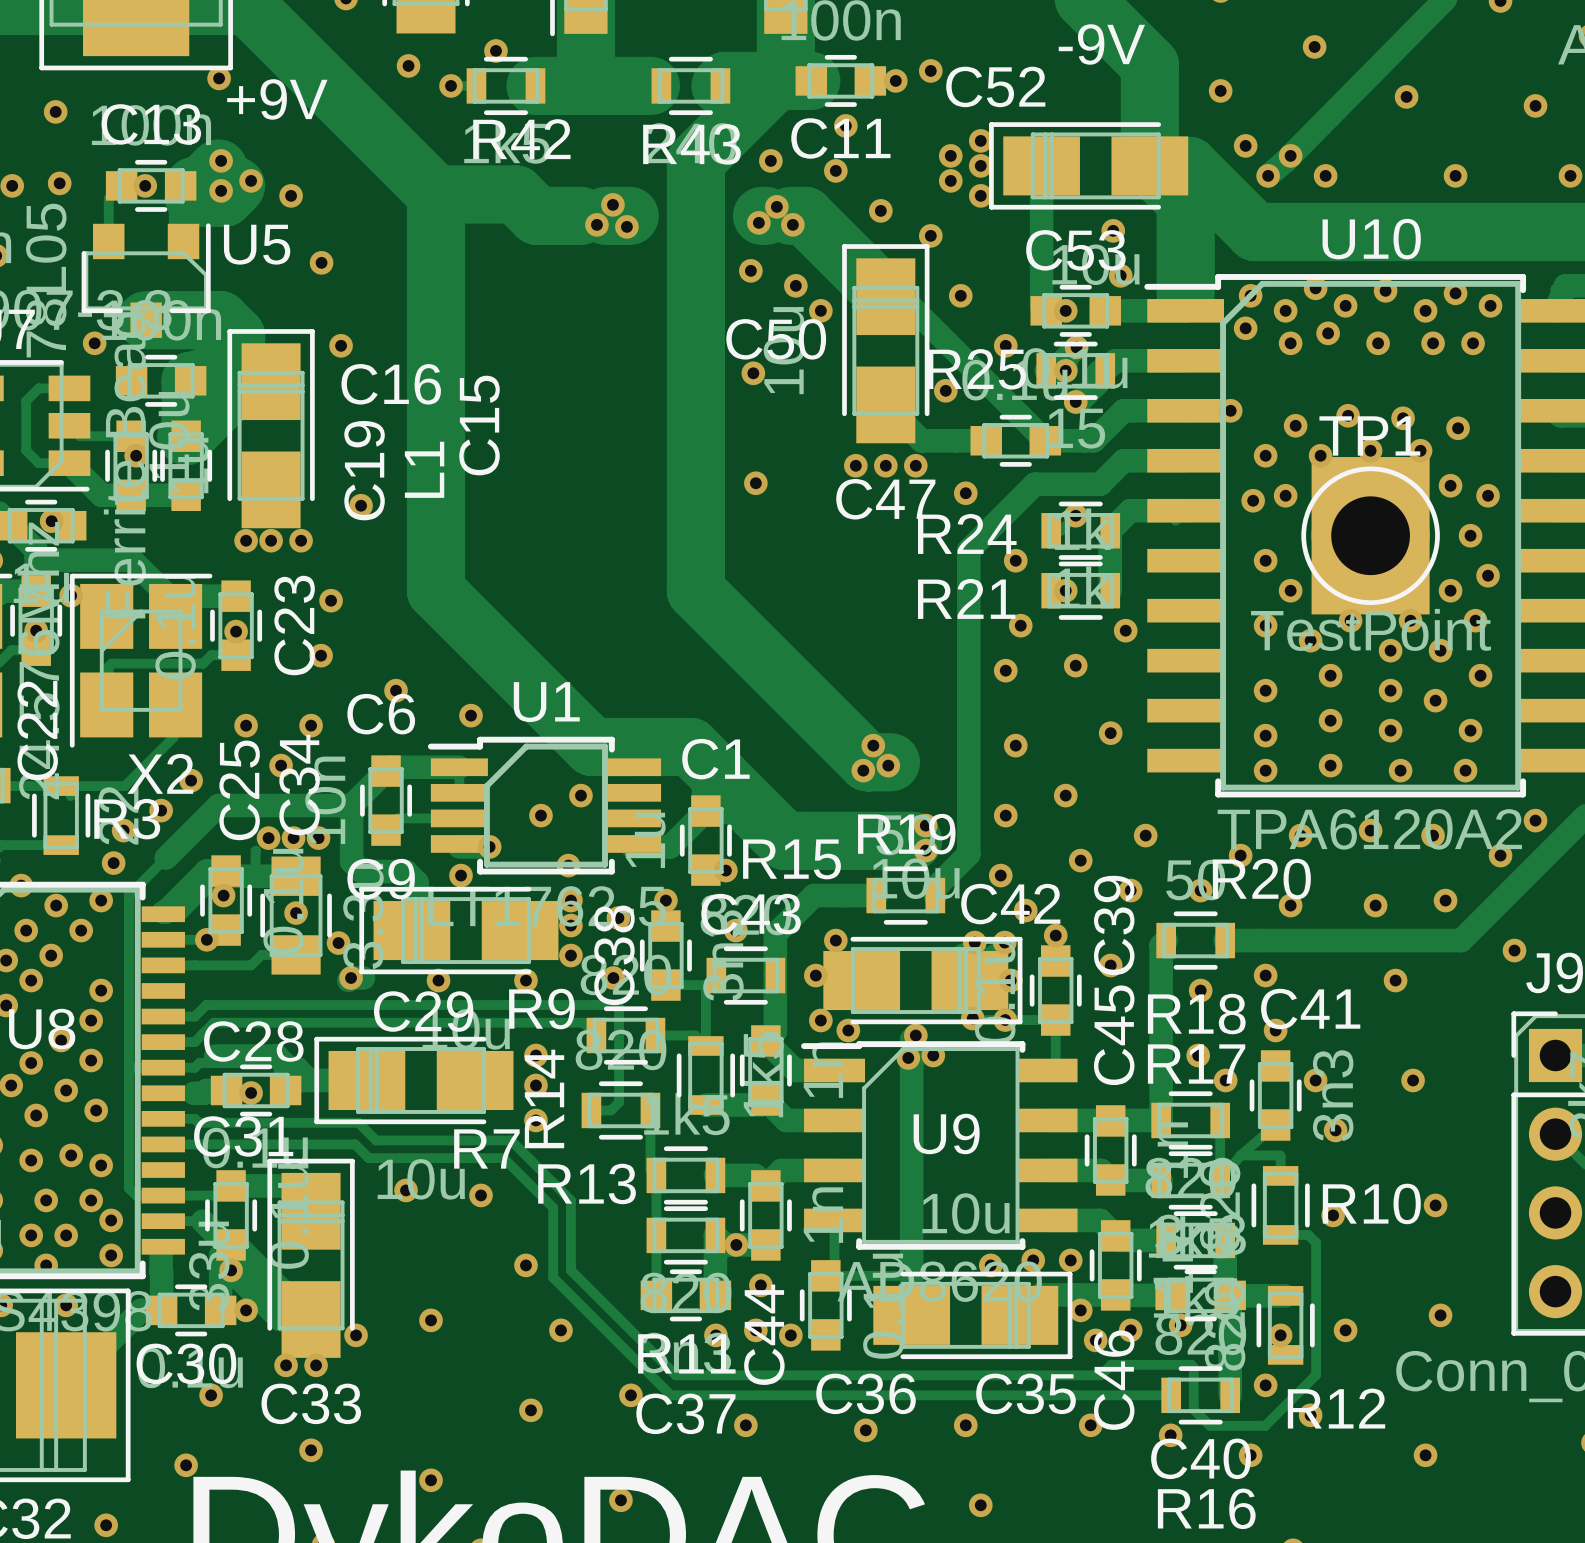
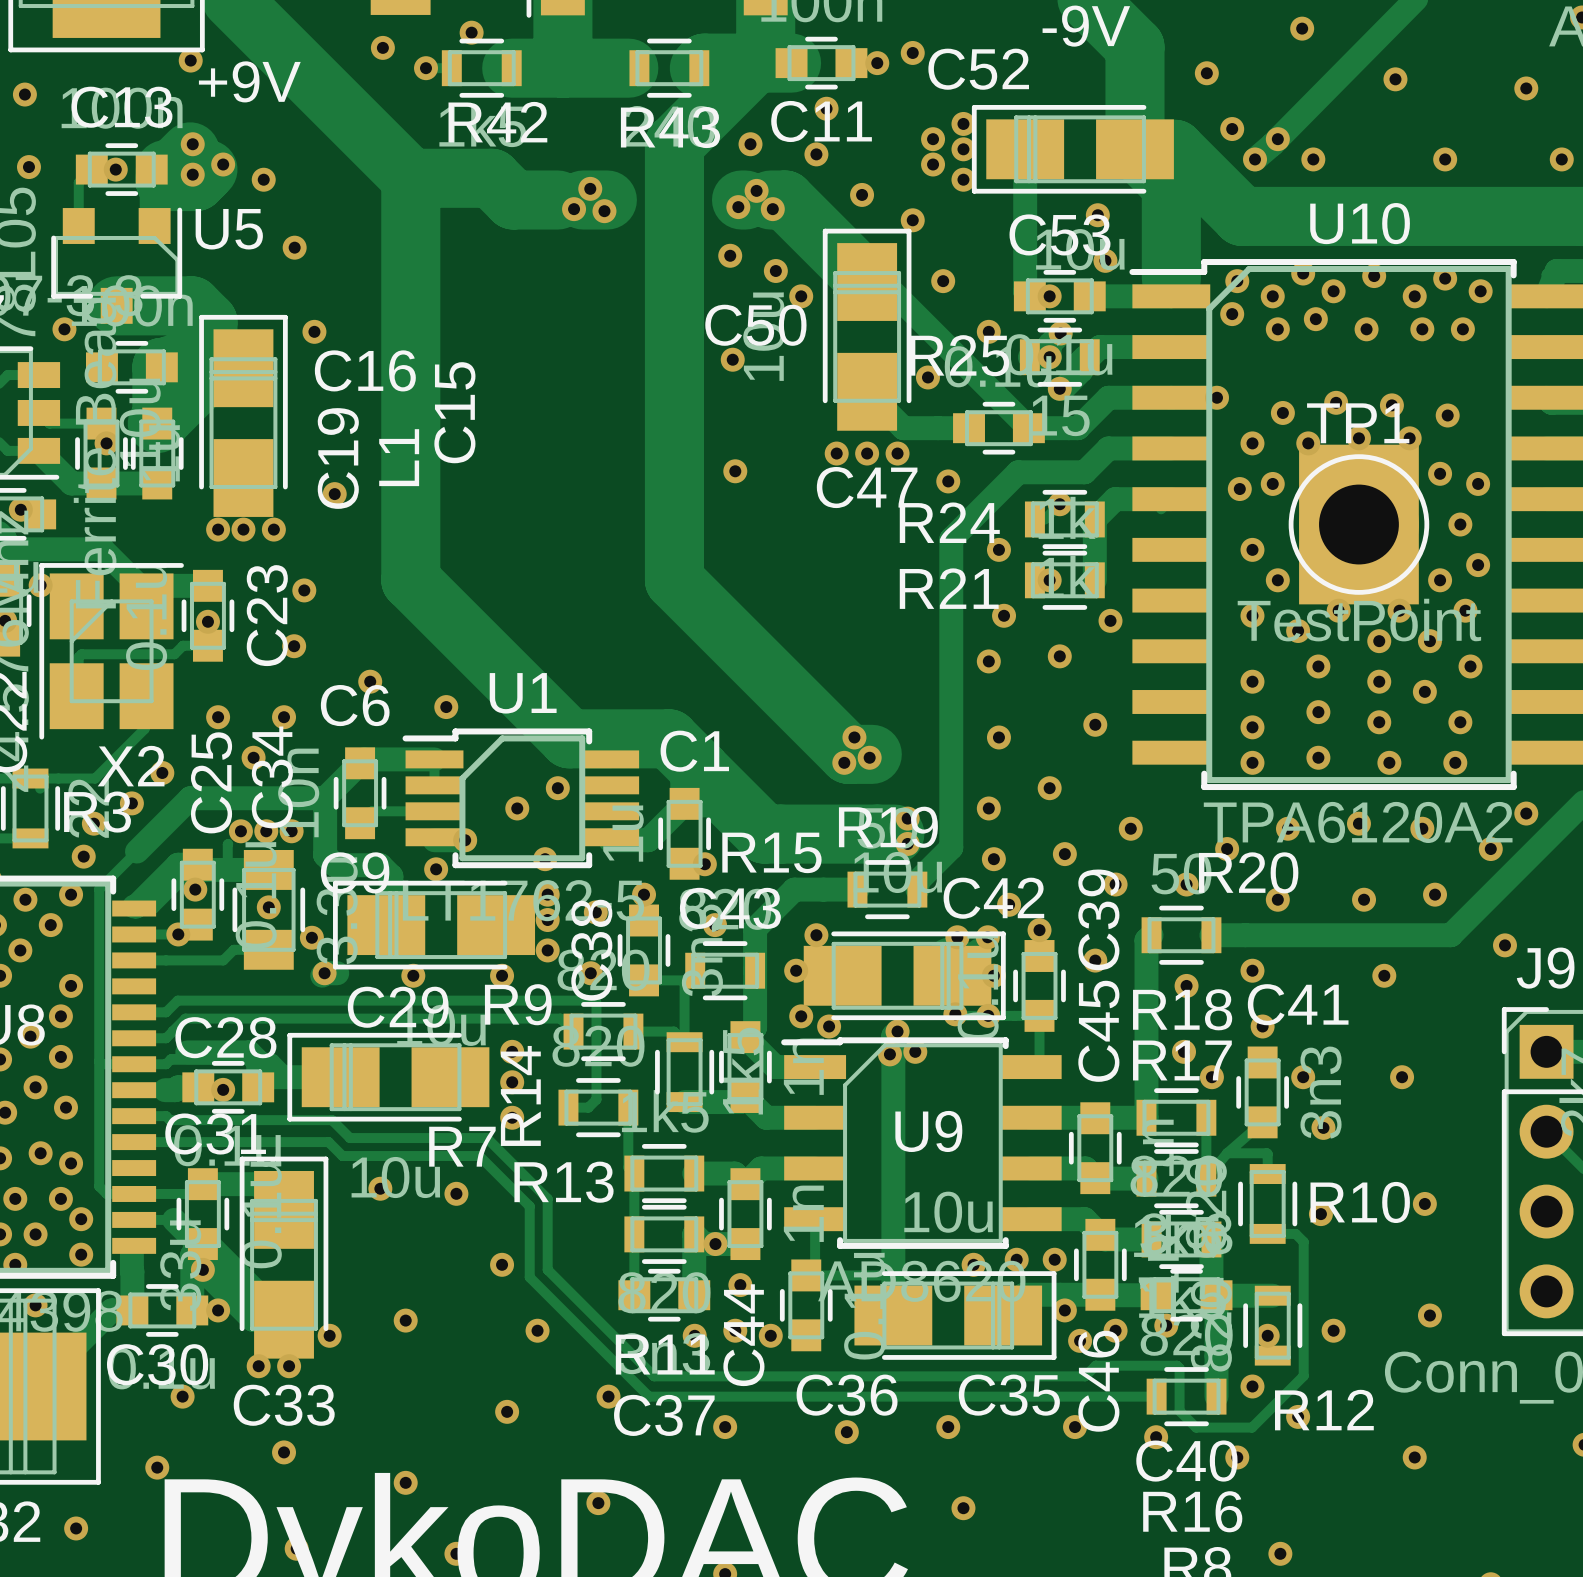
via position: (1000, 875) -> (993, 859)

